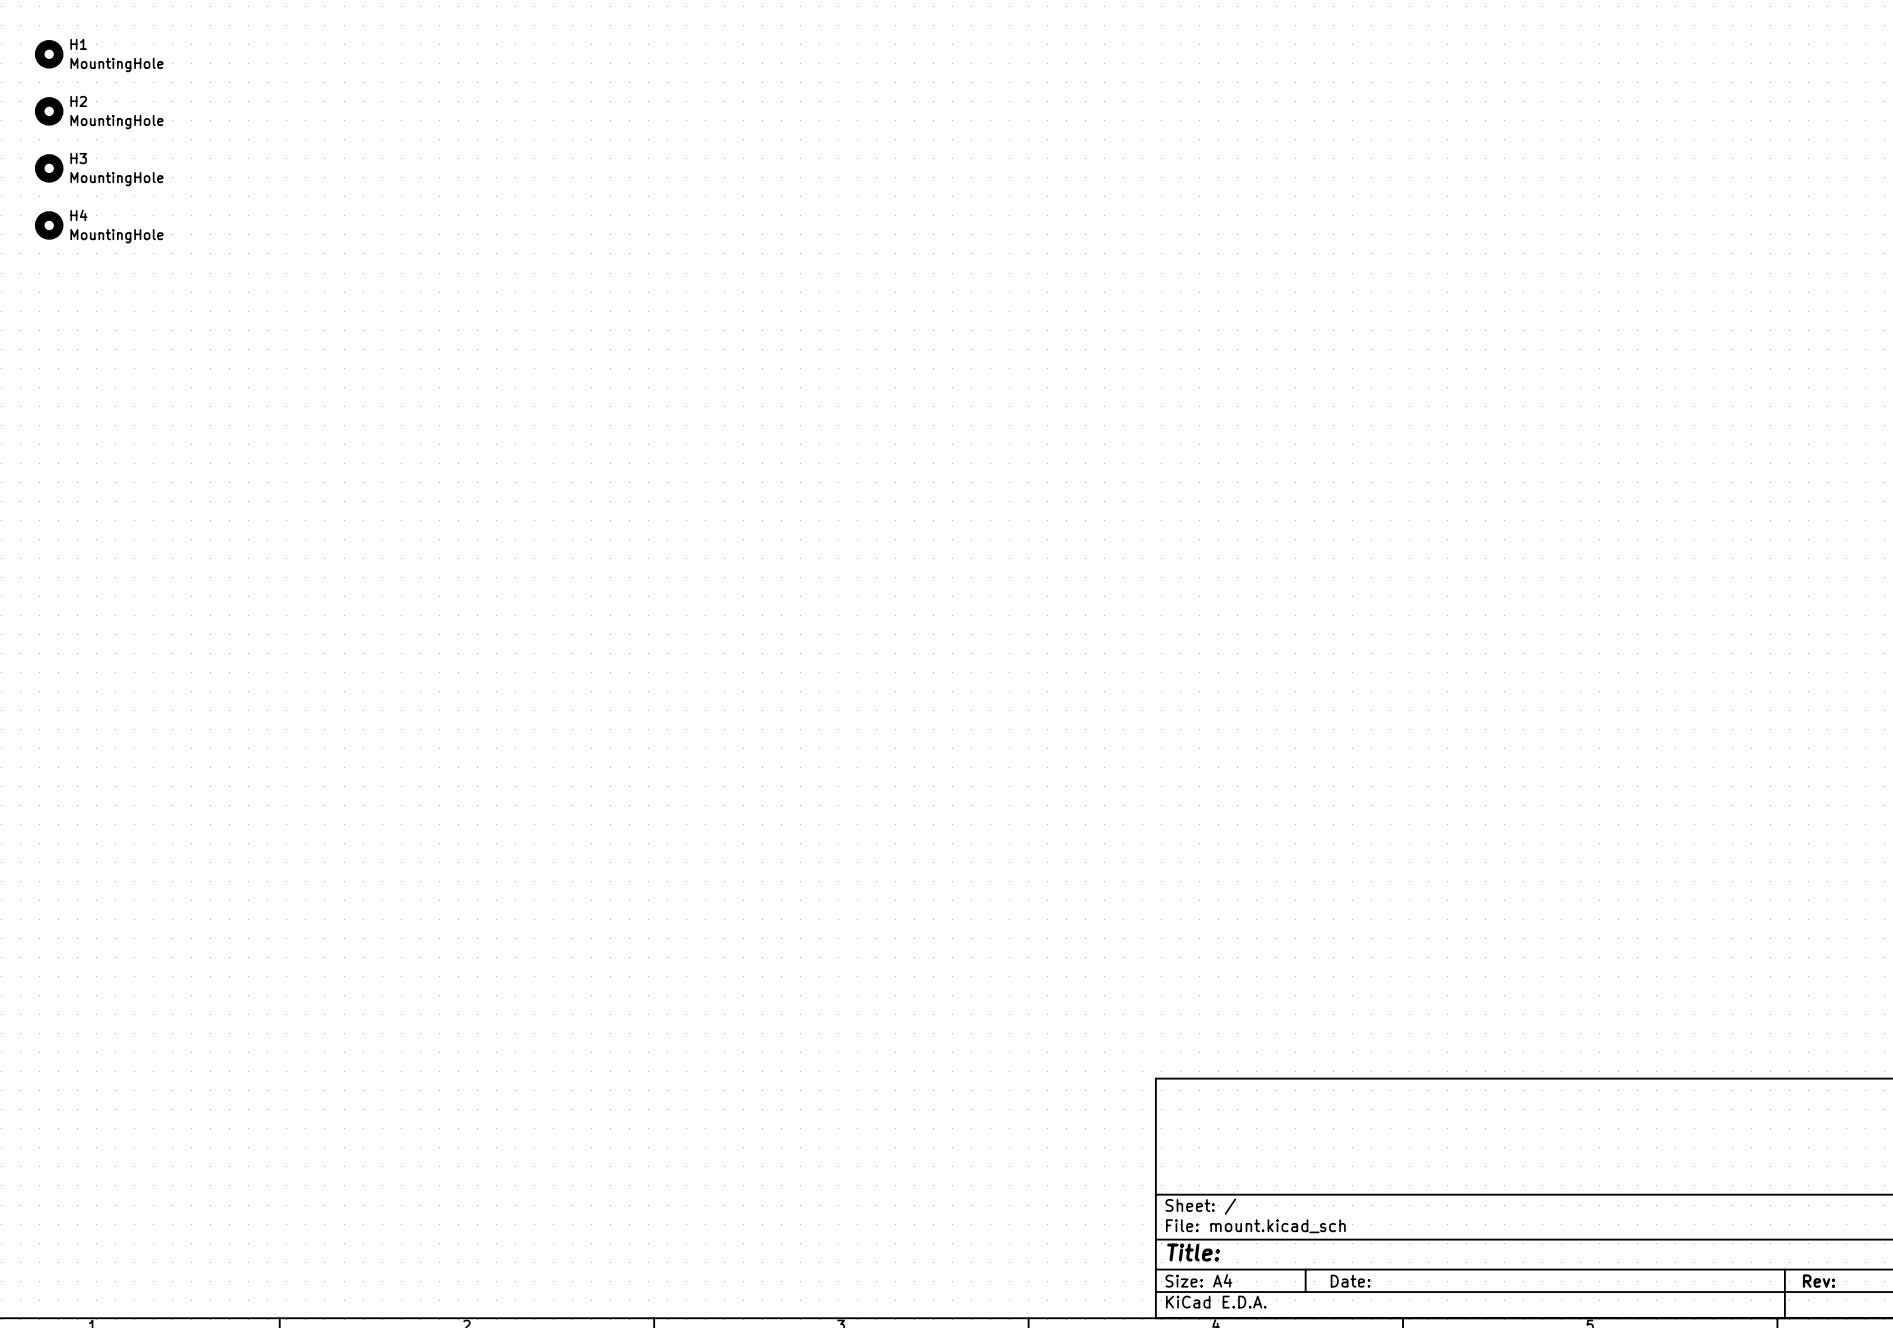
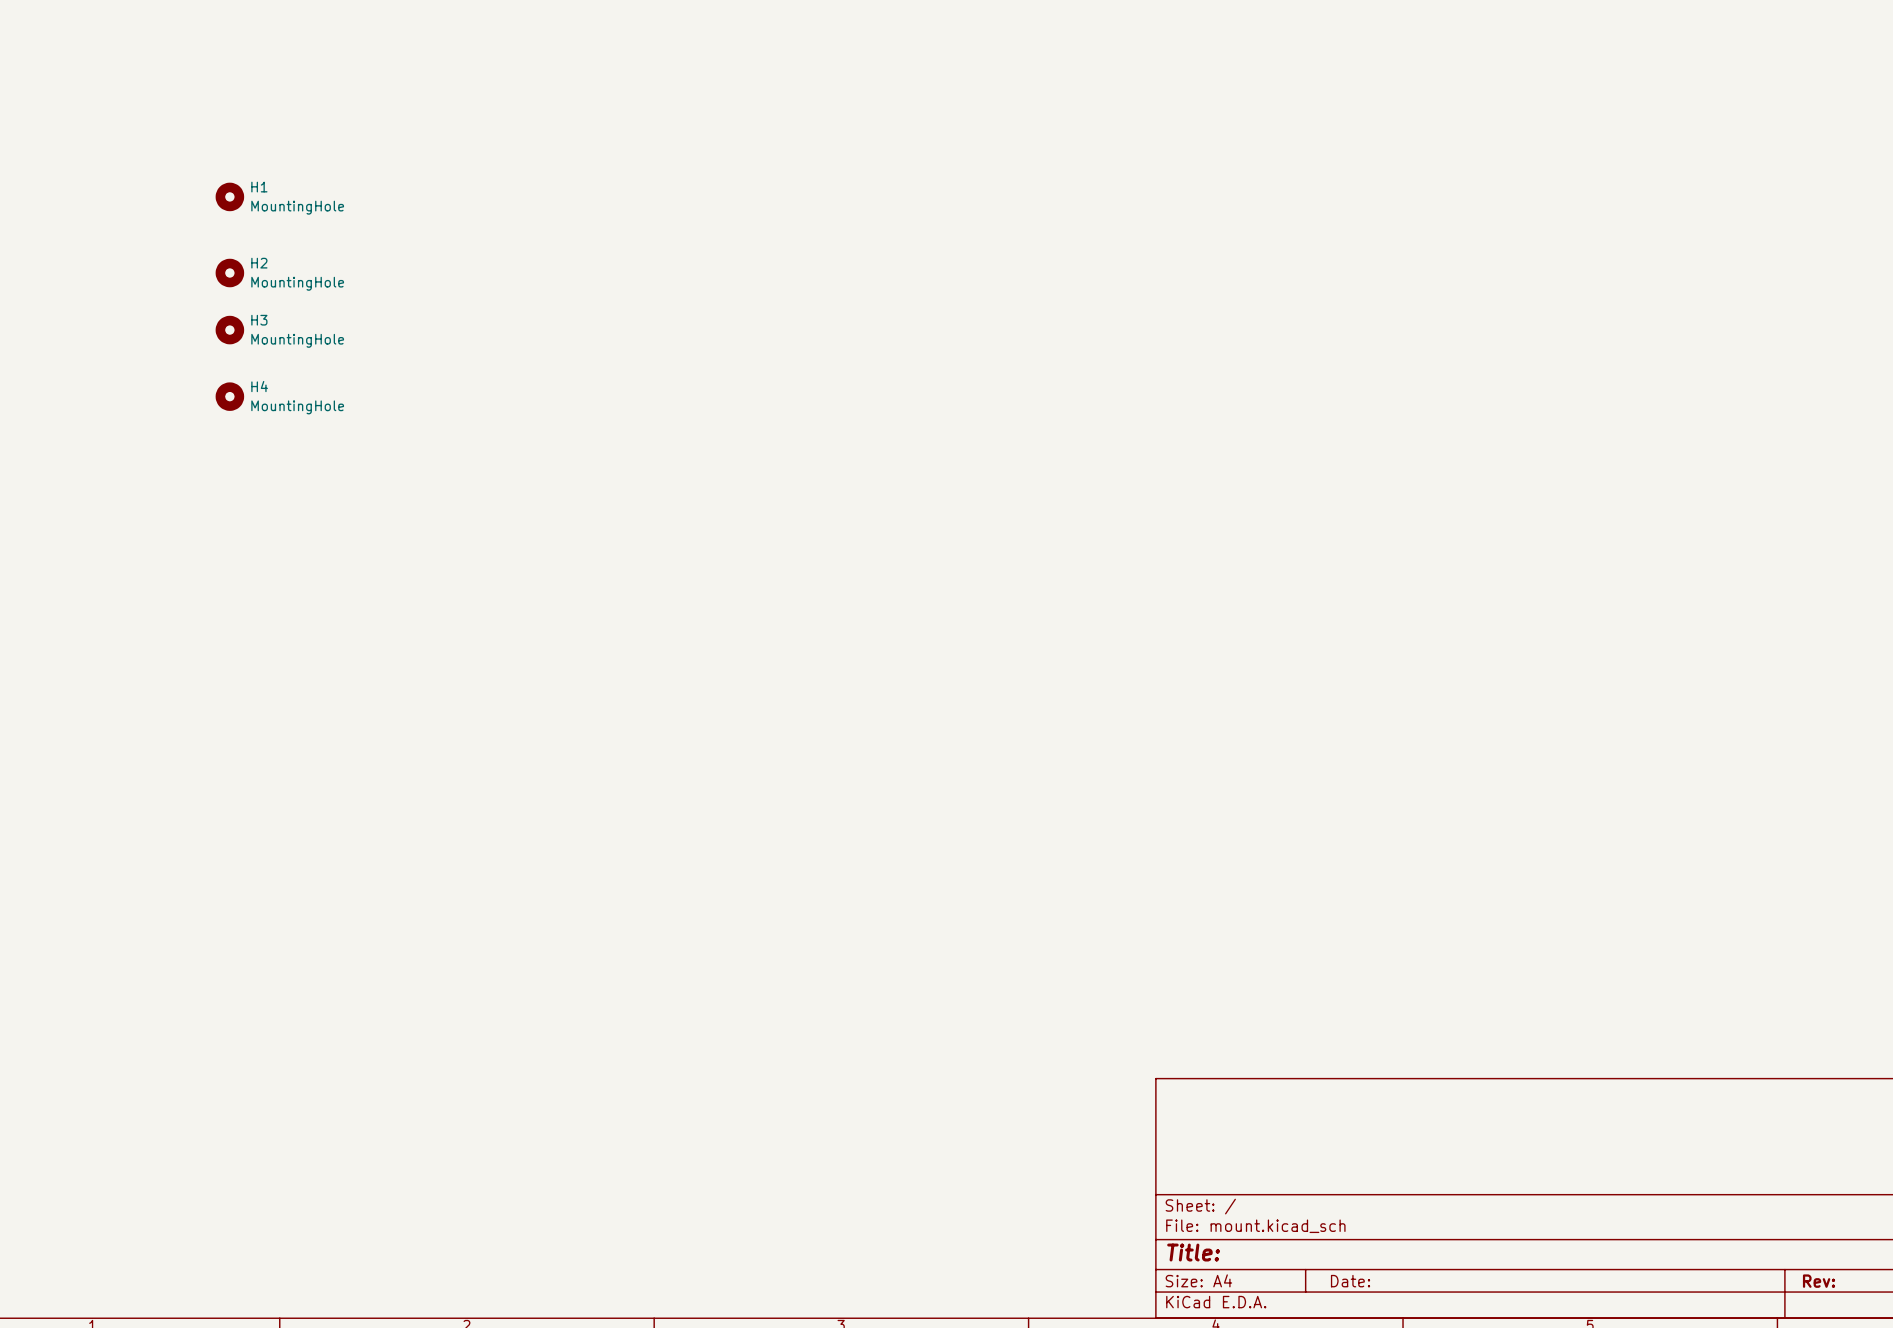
H1 position: (49, 54) -> (229, 196)
H2 position: (49, 111) -> (229, 273)
H3 position: (49, 168) -> (229, 330)
H4 position: (49, 225) -> (229, 396)

